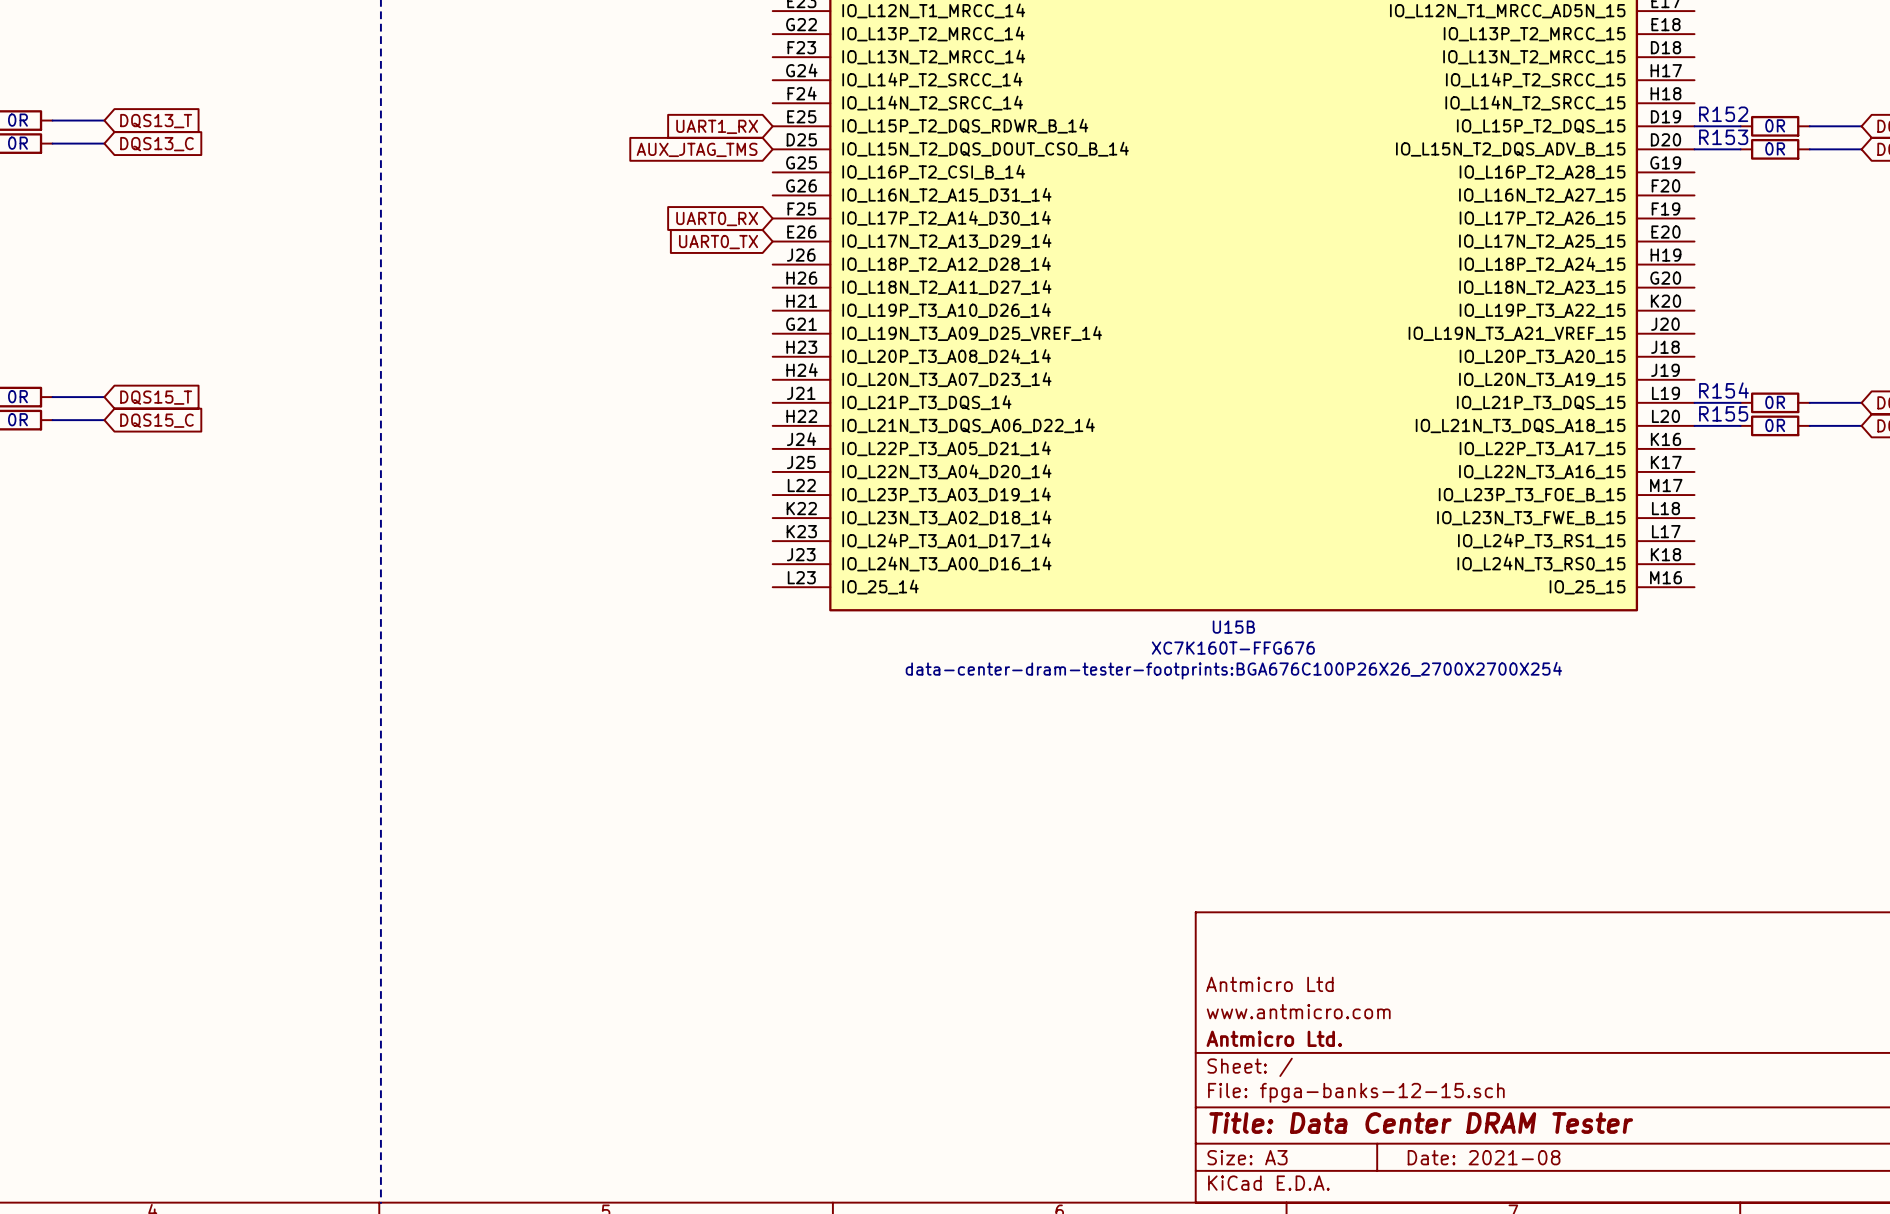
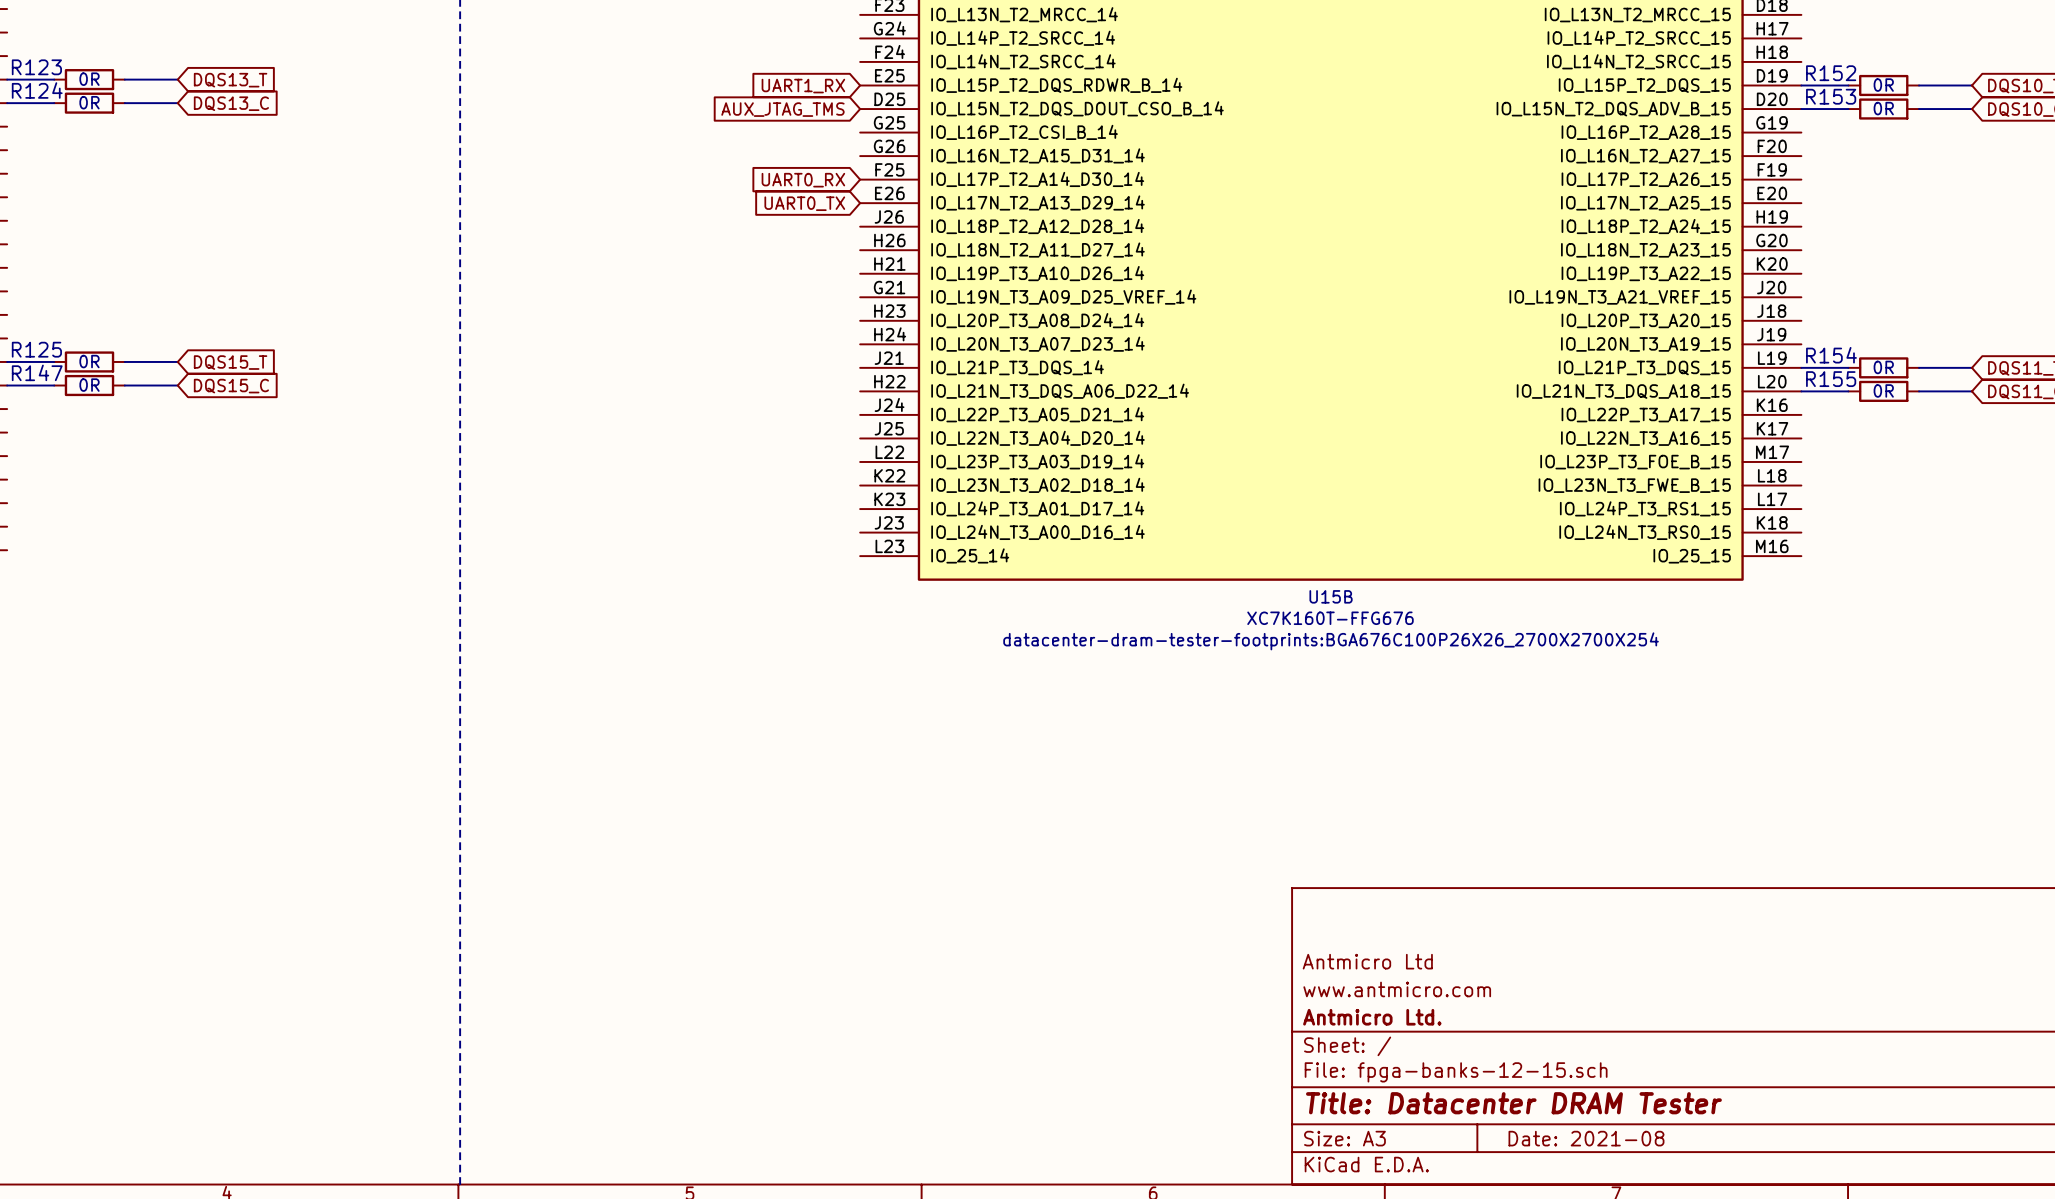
U15B text: data-center-dram-tester-footprints:BGA676C100P26X26_2700X2700X254 (1233, 670) -> datacenter-dram-tester-footprints:BGA676C100P26X26_2700X2700X254 (1331, 641)
title block: Title: Data Center DRAM Tester (1421, 1123) -> Title: Datacenter DRAM Tester (1513, 1103)

